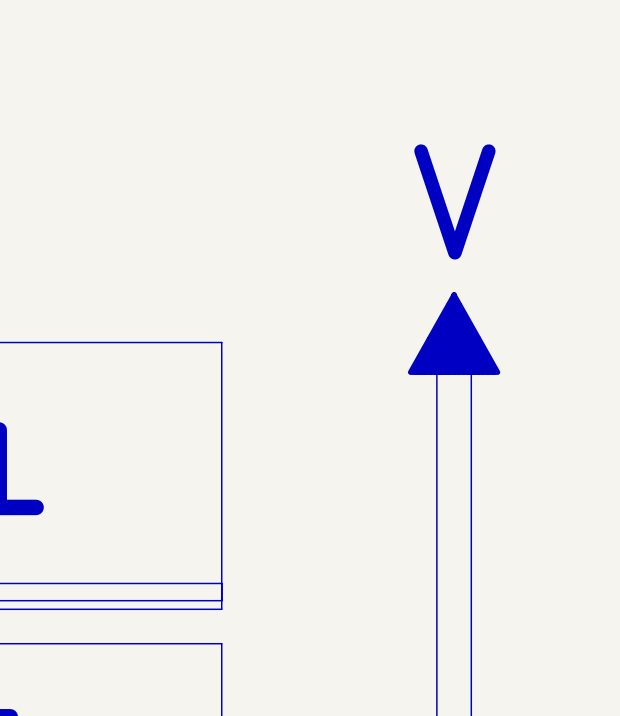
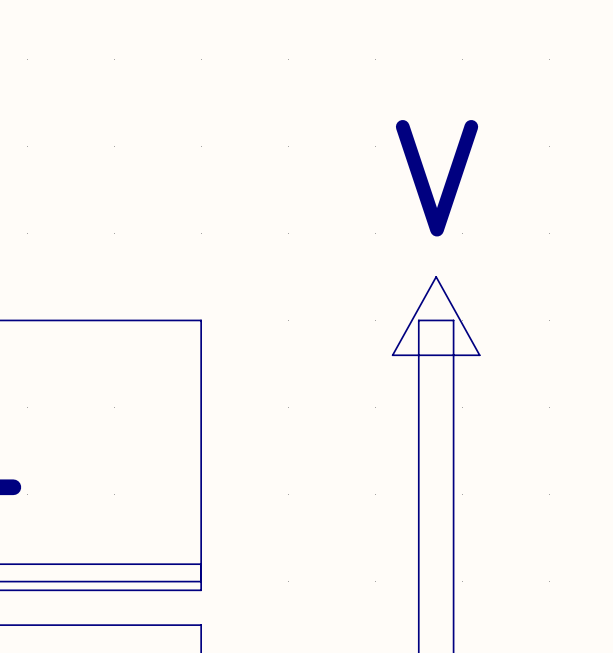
line: none -> (436, 276) (392, 355) (479, 355) (436, 276)
text: ▲ (454, 333) -> none

